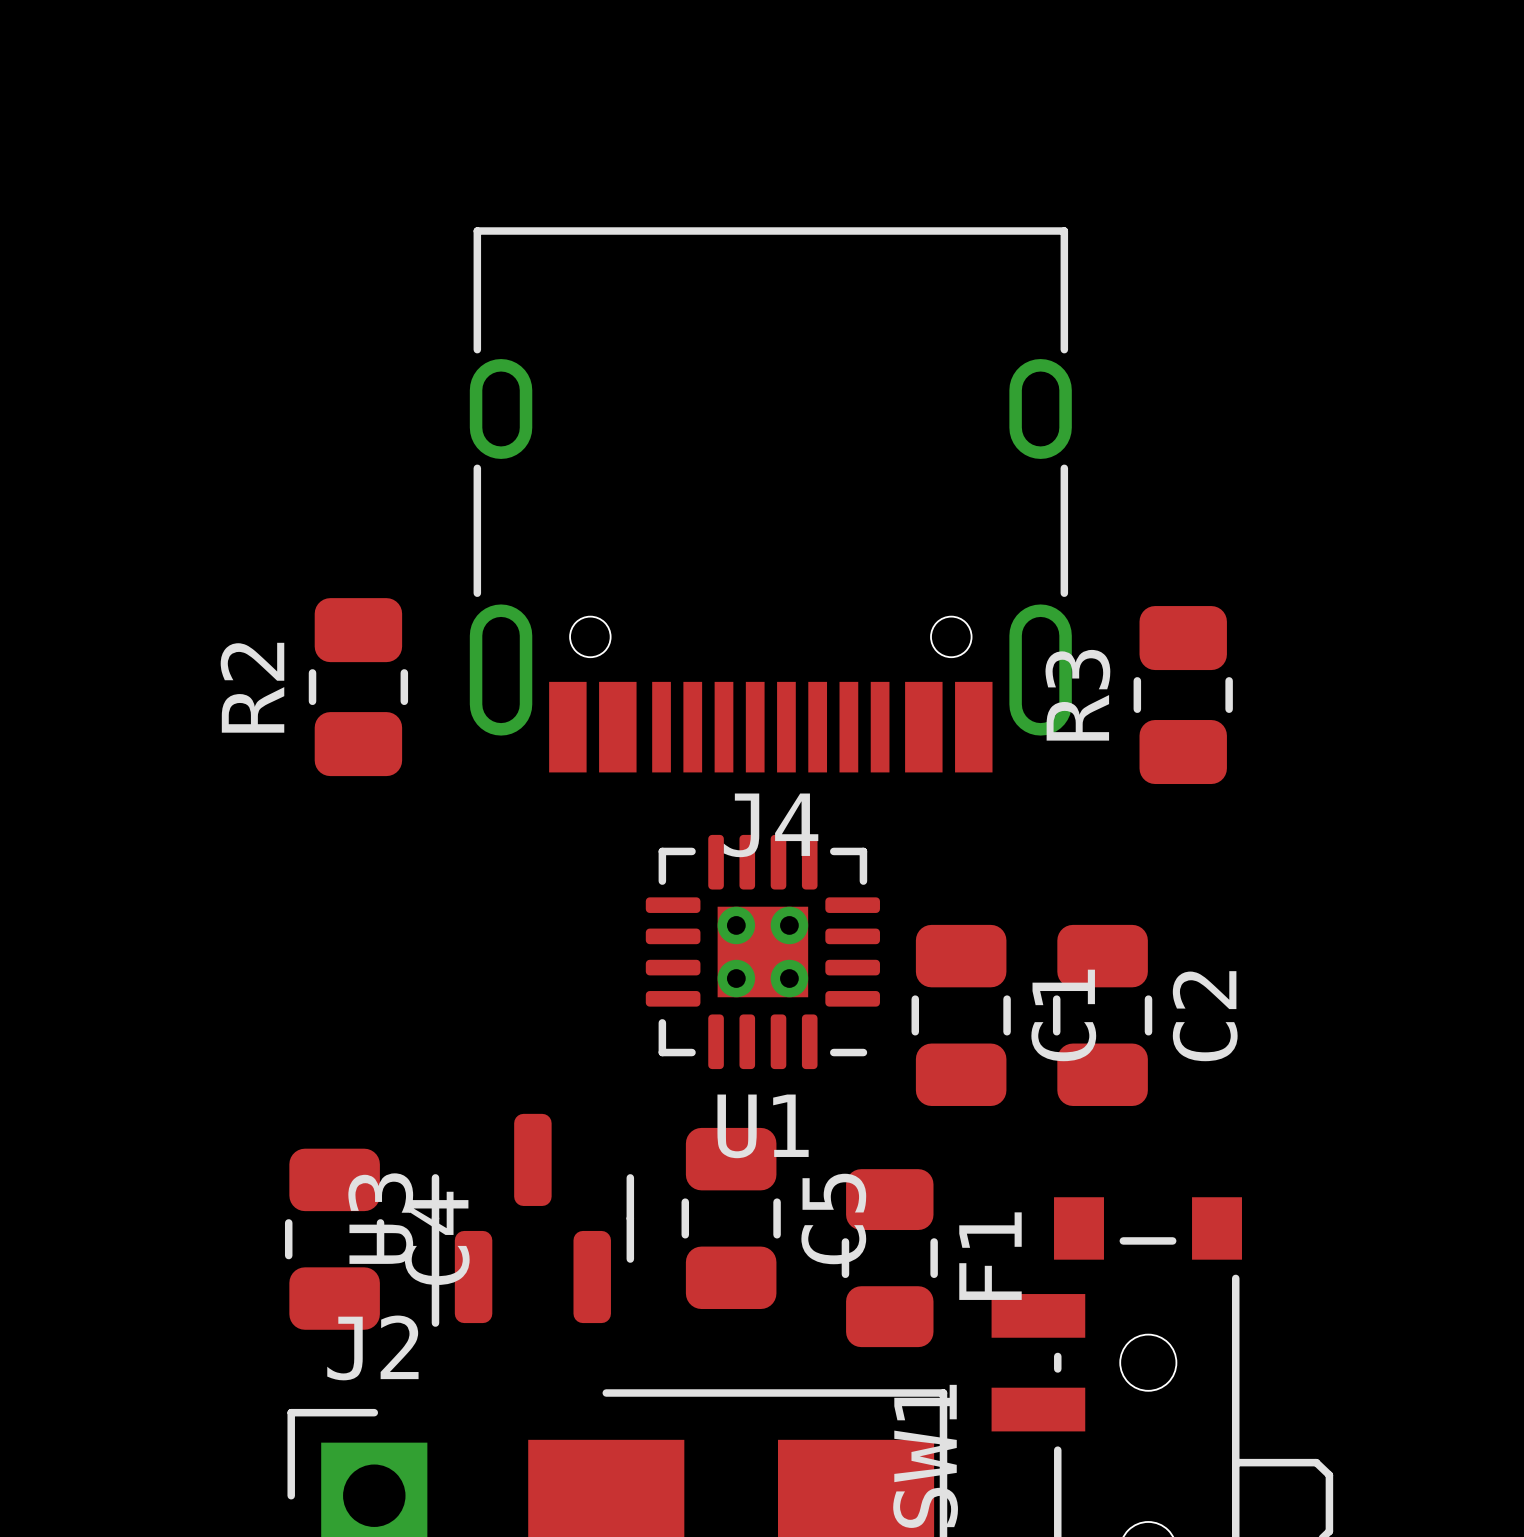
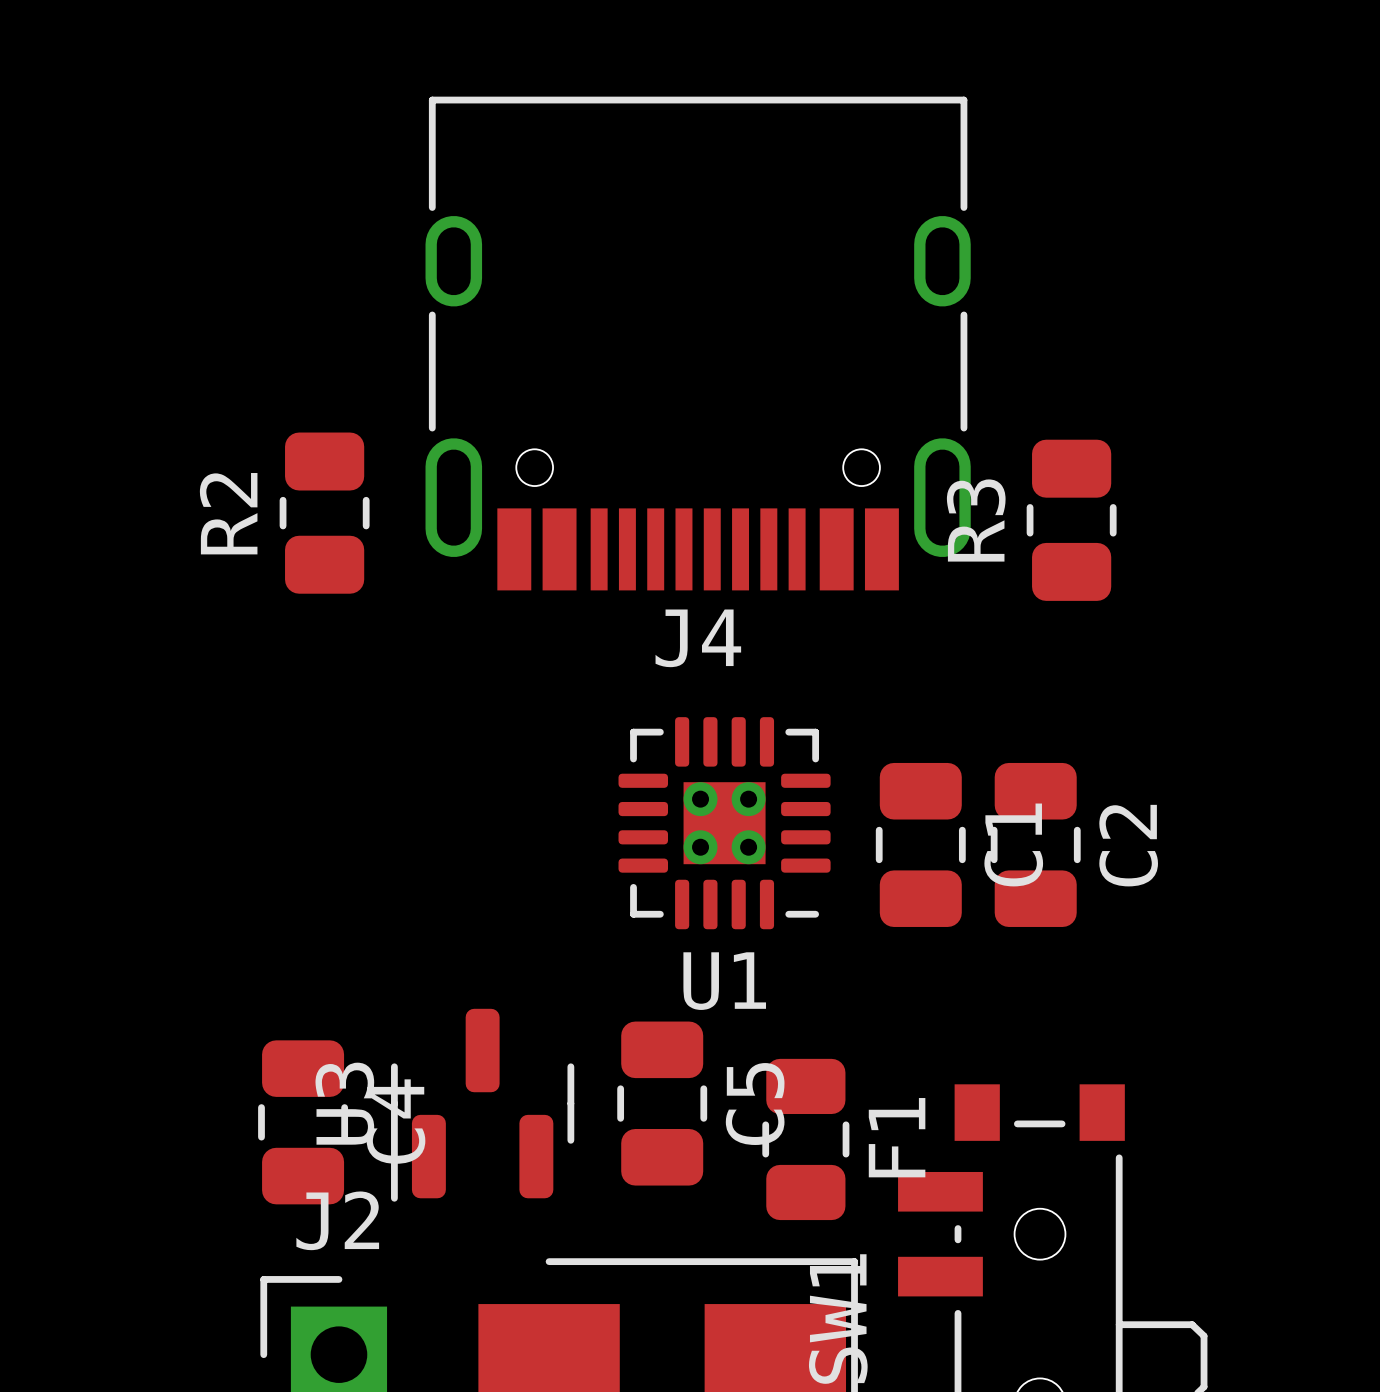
J4 position: (770, 499) -> (698, 343)
R2 position: (358, 687) -> (324, 513)
R3 position: (1183, 695) -> (1071, 520)
U1 position: (762, 951) -> (724, 823)
C1 position: (961, 1015) -> (920, 844)
C2 position: (1102, 1015) -> (1035, 844)

